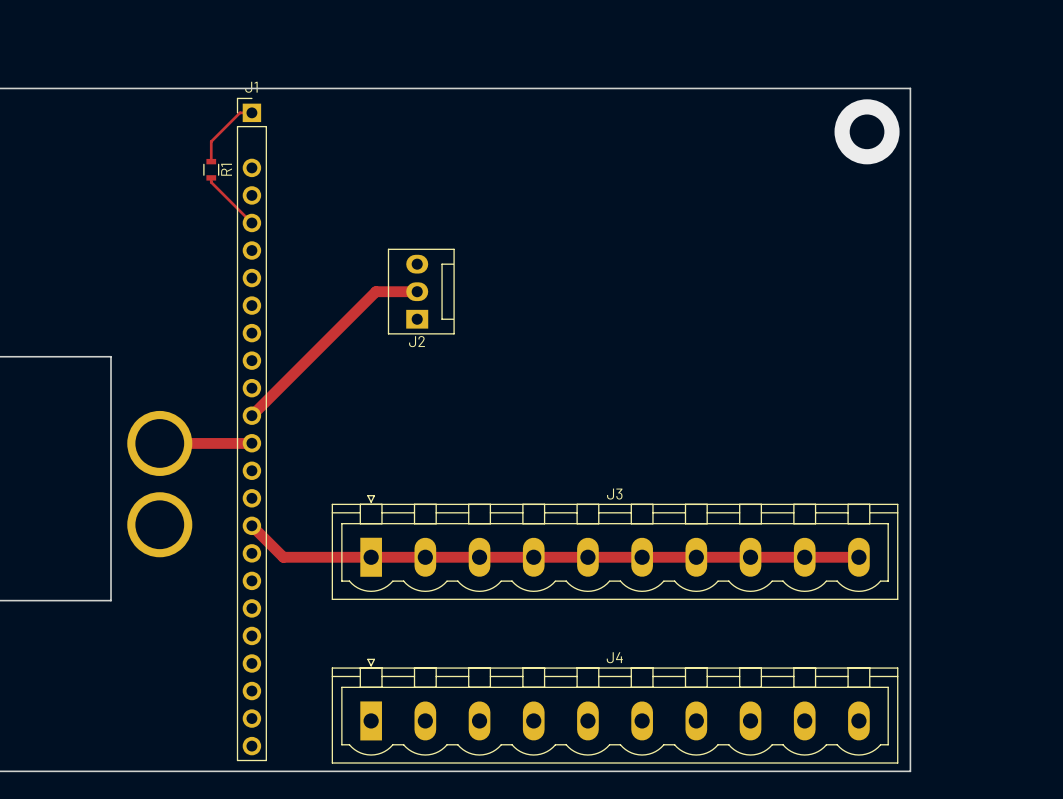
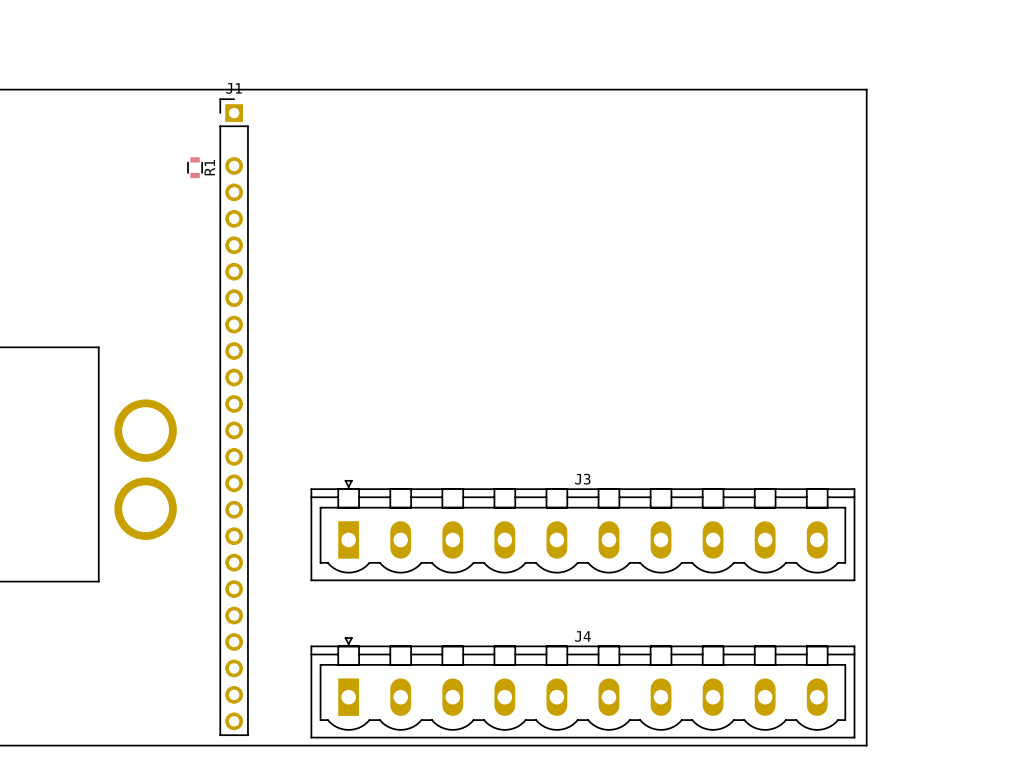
track: (251, 112) (239, 112) (211, 141) (211, 161) -> none
via: (867, 131) -> none
track: (211, 177) (211, 182) (251, 222) -> none
track: (417, 291) (375, 291) (251, 415) -> none
J2: (421, 291) -> none
track: (251, 443) (159, 443) -> none
track: (251, 525) (283, 557) (858, 557) -> none

